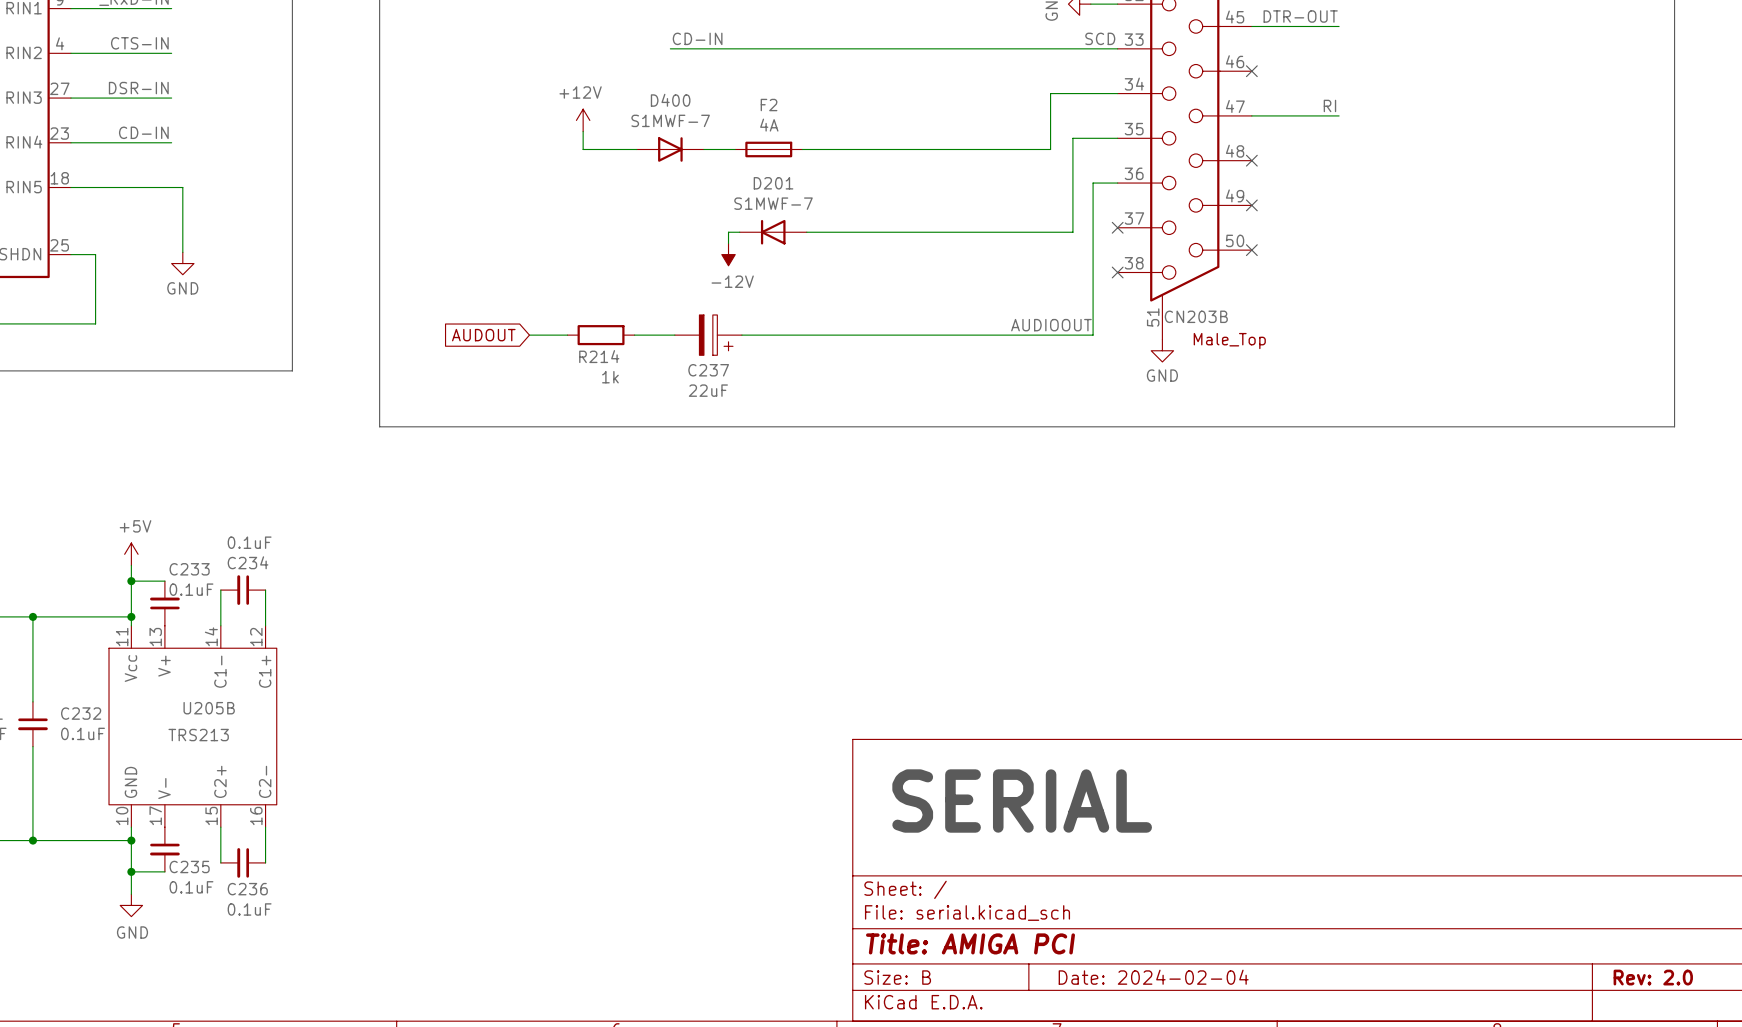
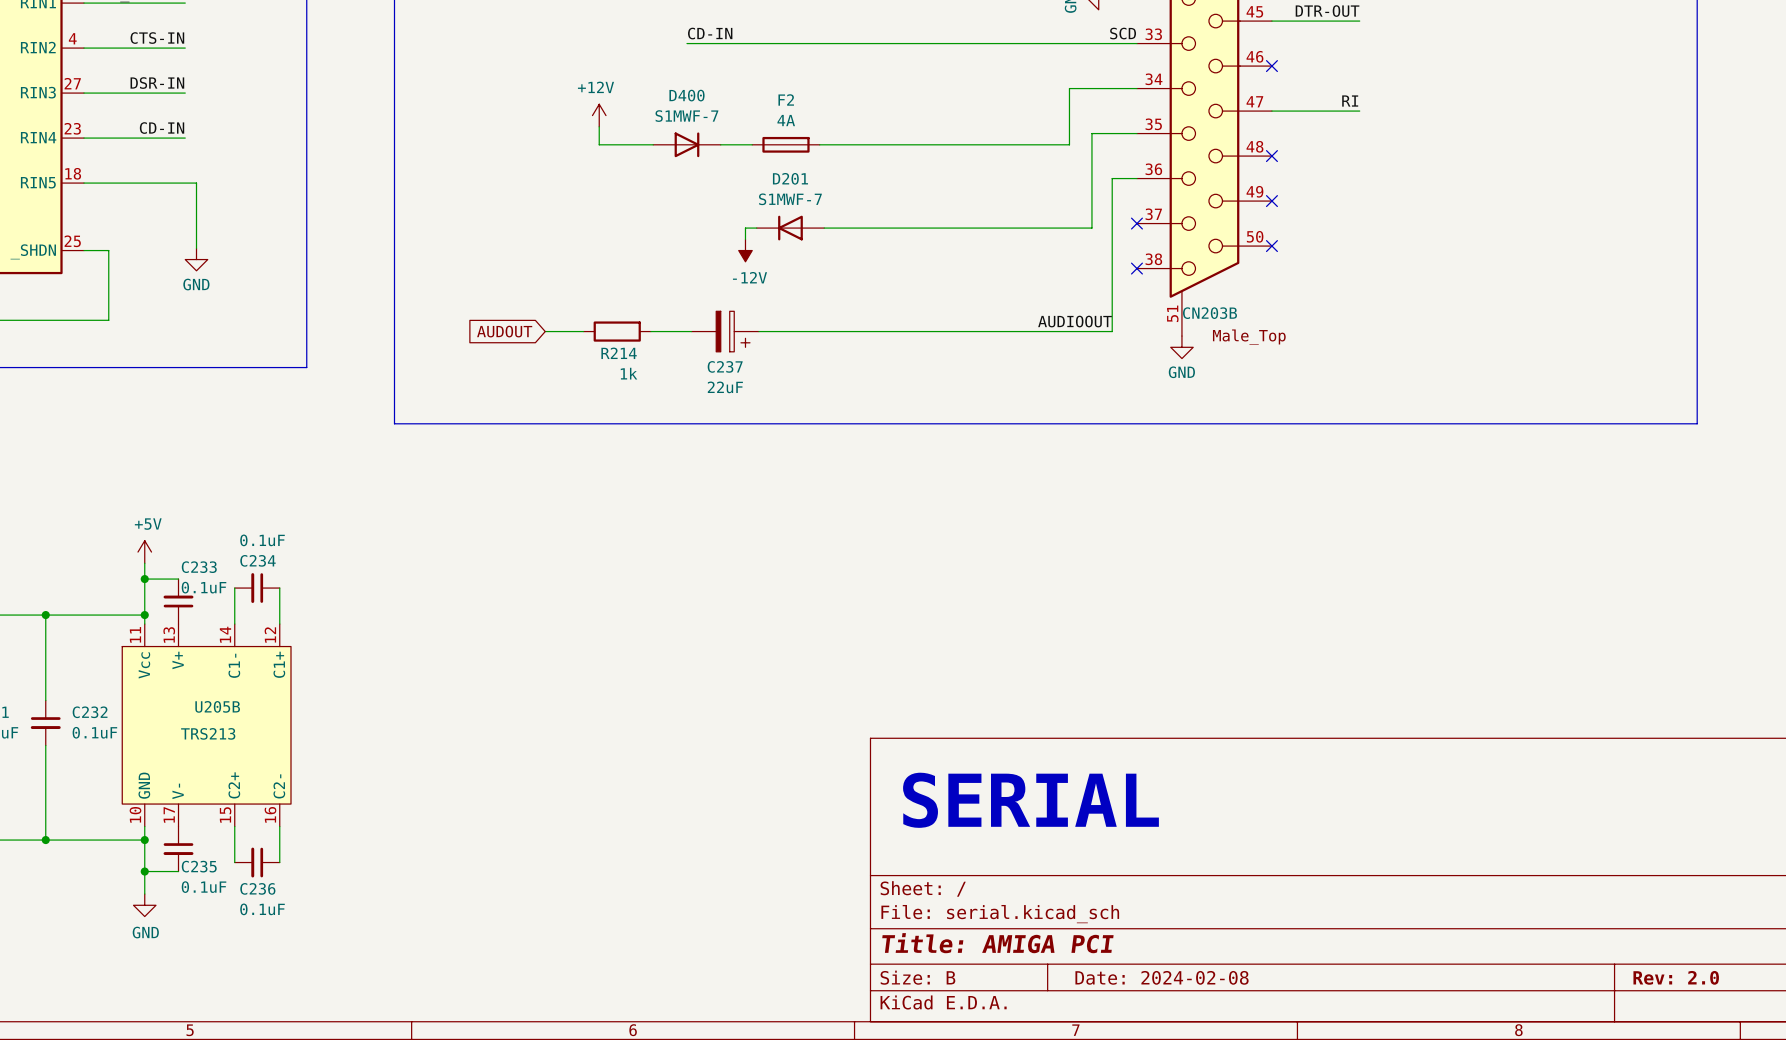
title block: Date: 2024-02-04 (1153, 977) -> Date: 2024-02-08 (1162, 977)

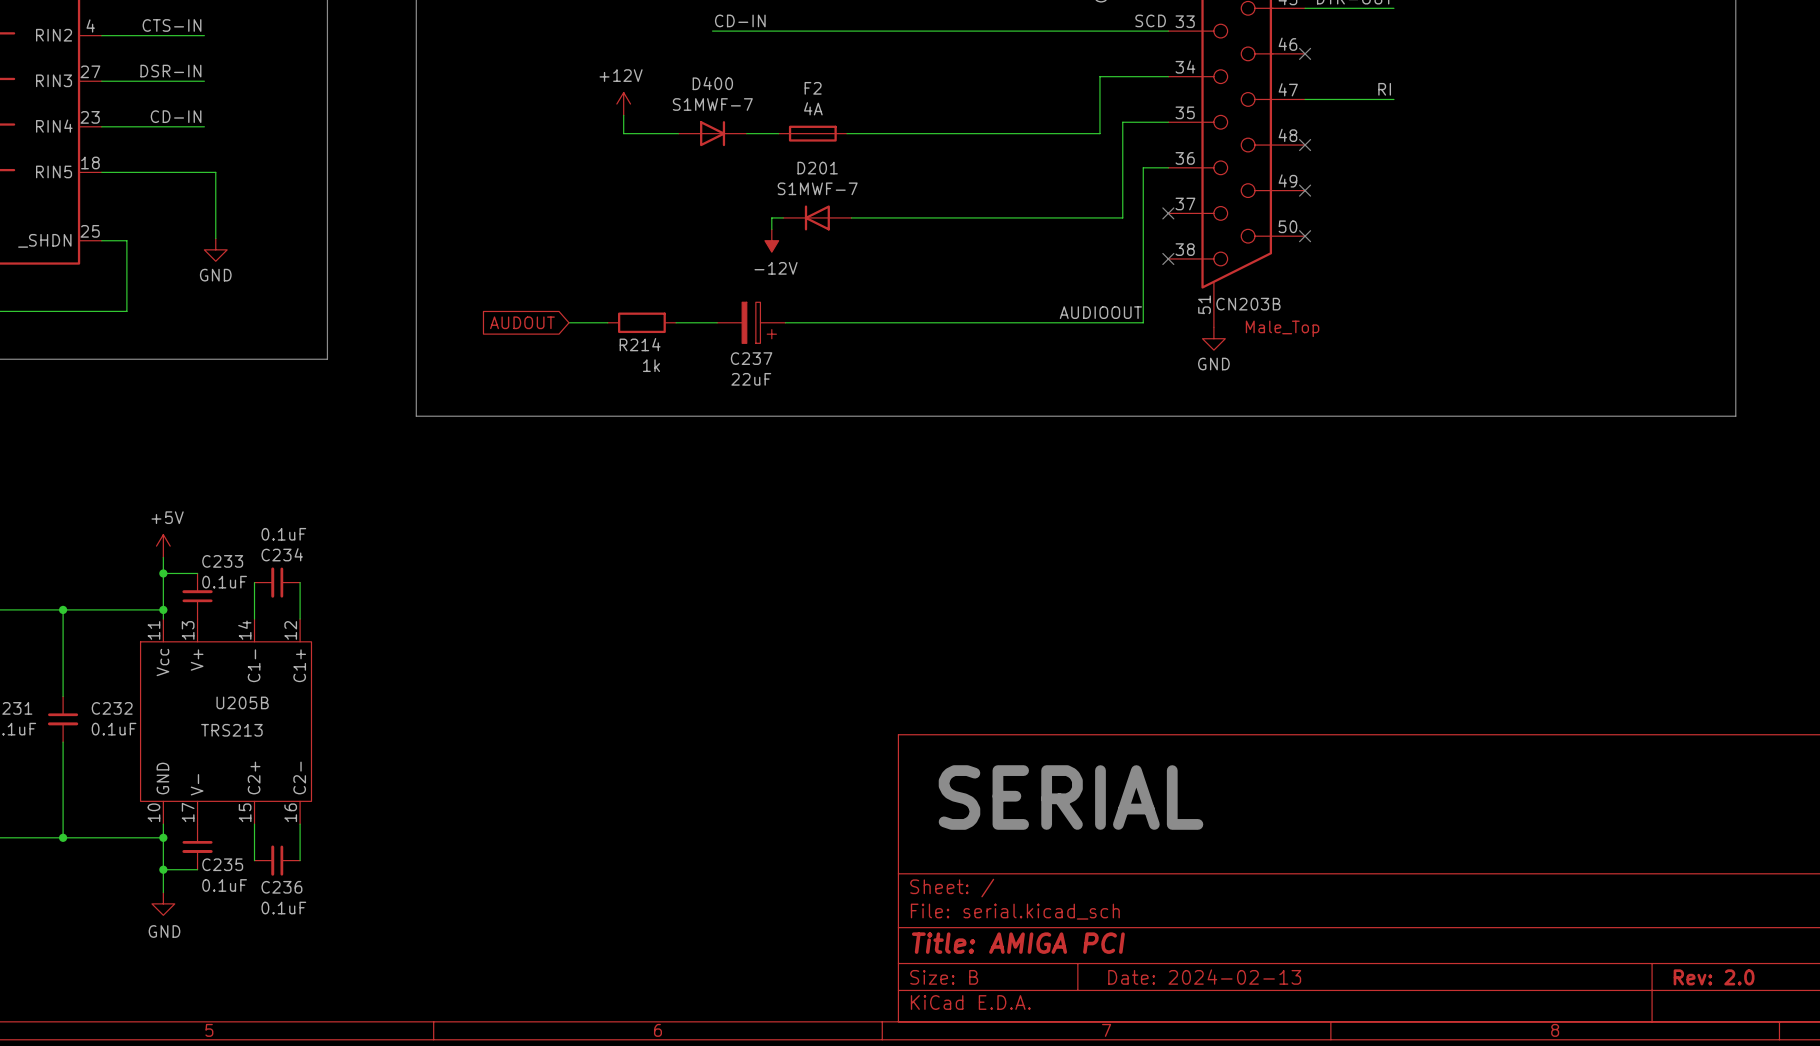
title block: Date: 2024-02-08 (1162, 977) -> Date: 2024-02-13 (1204, 977)

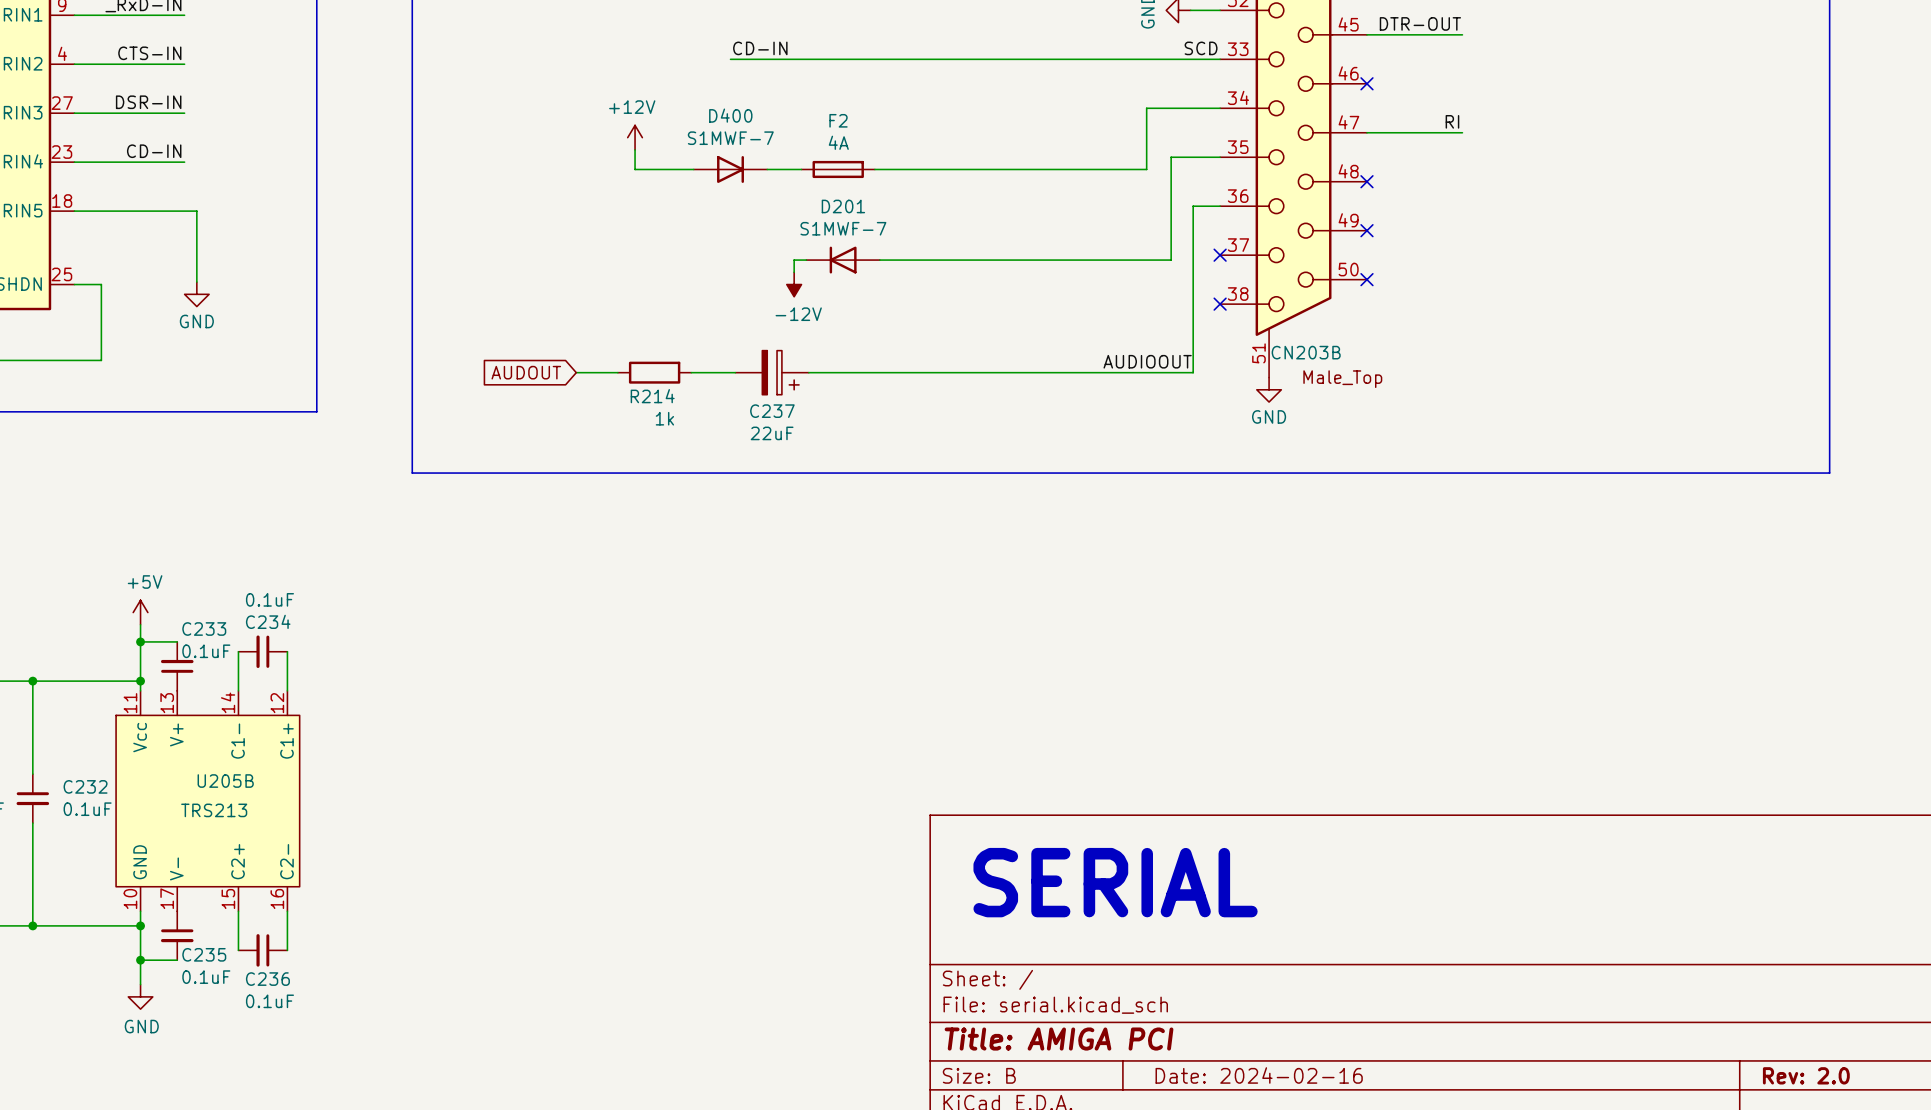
title block: Date: 2024-02-13 (1204, 977) -> Date: 2024-02-16 (1259, 1075)

